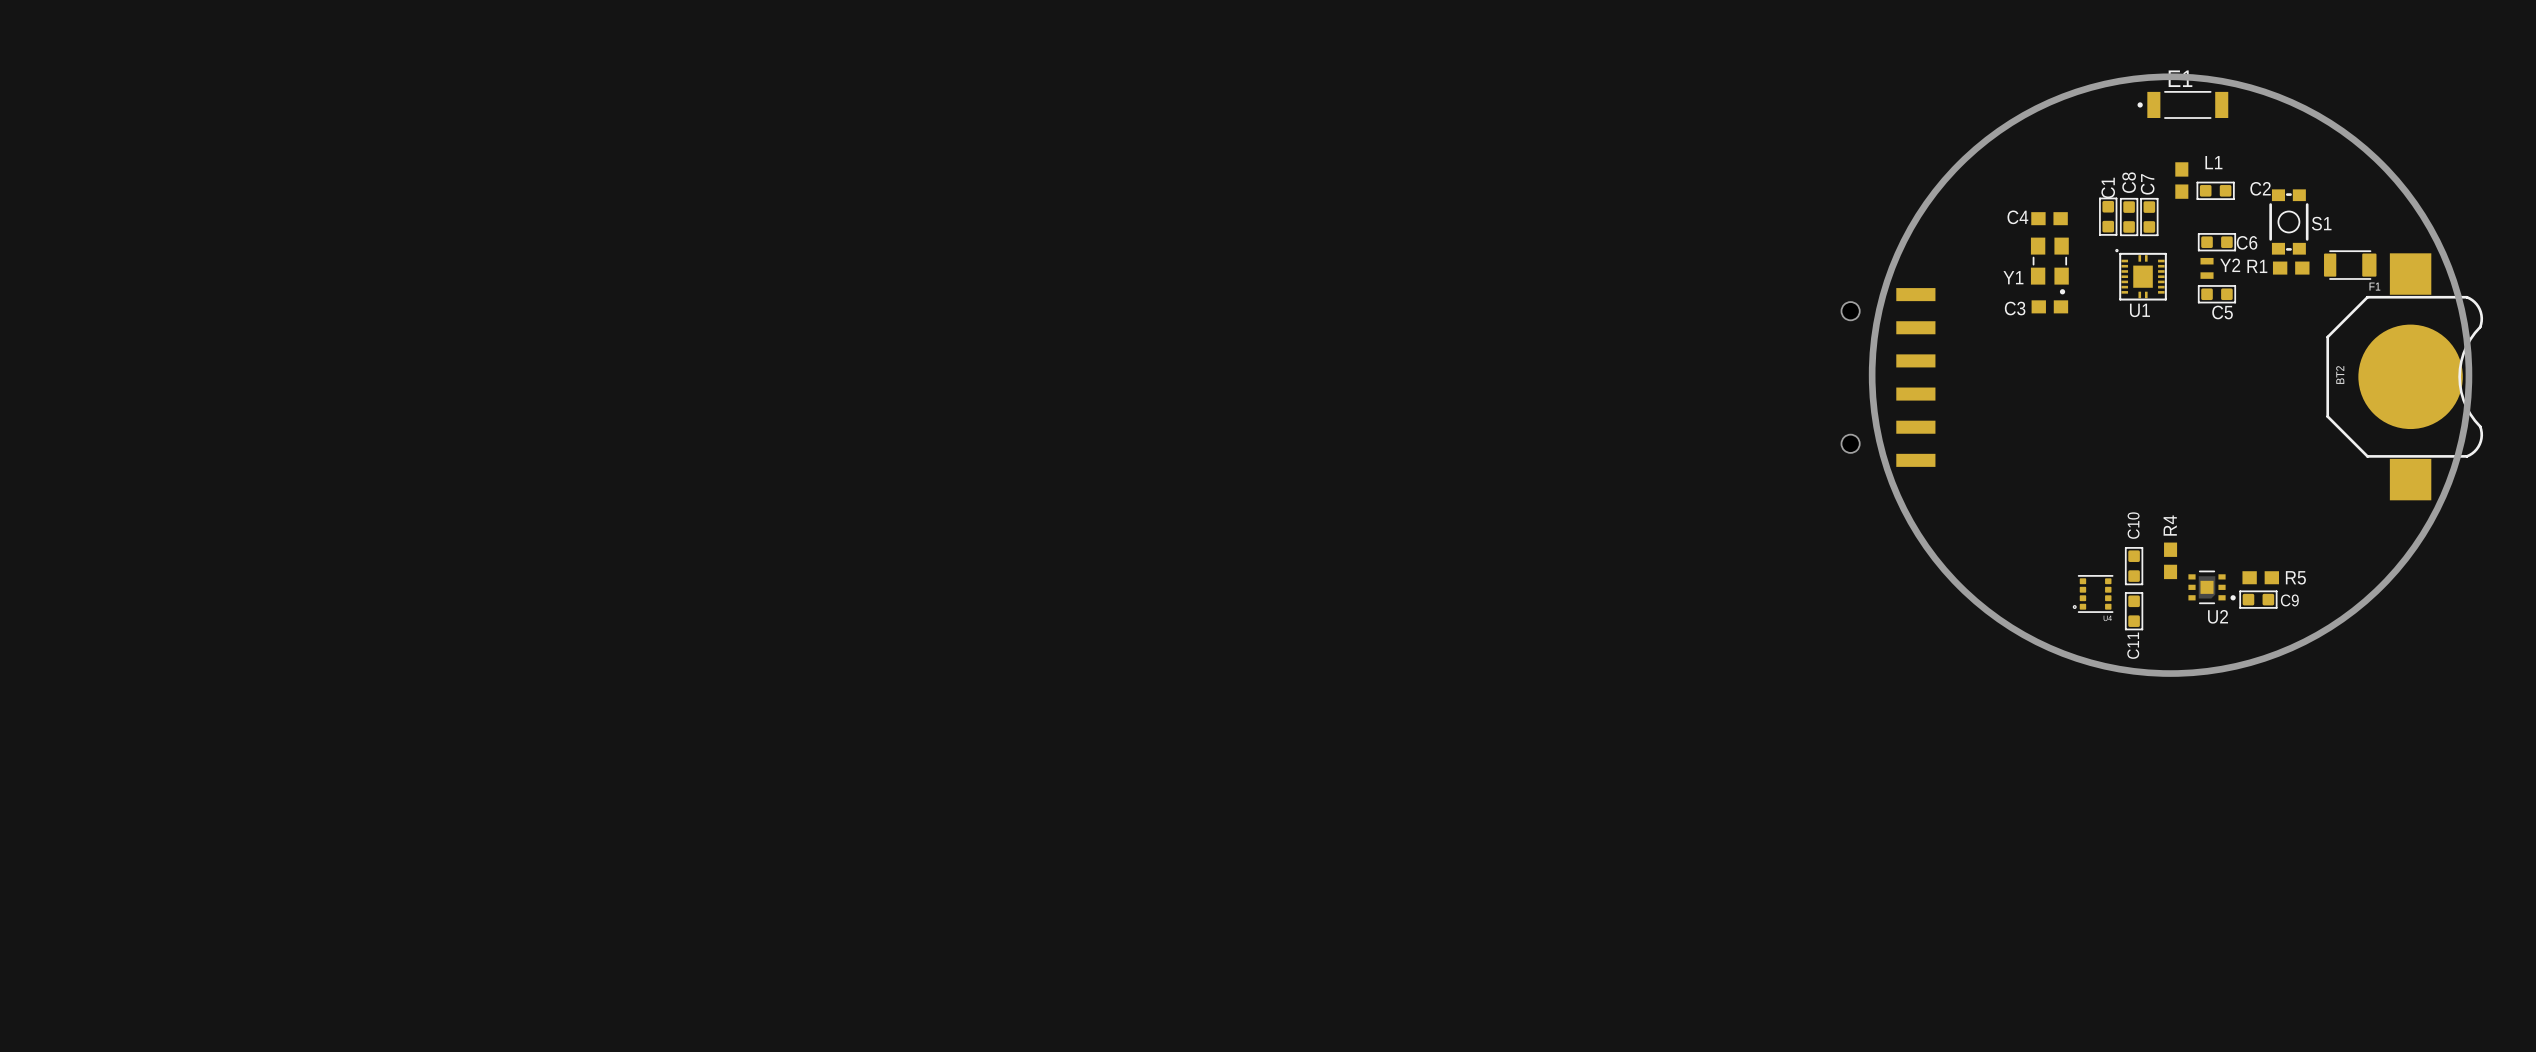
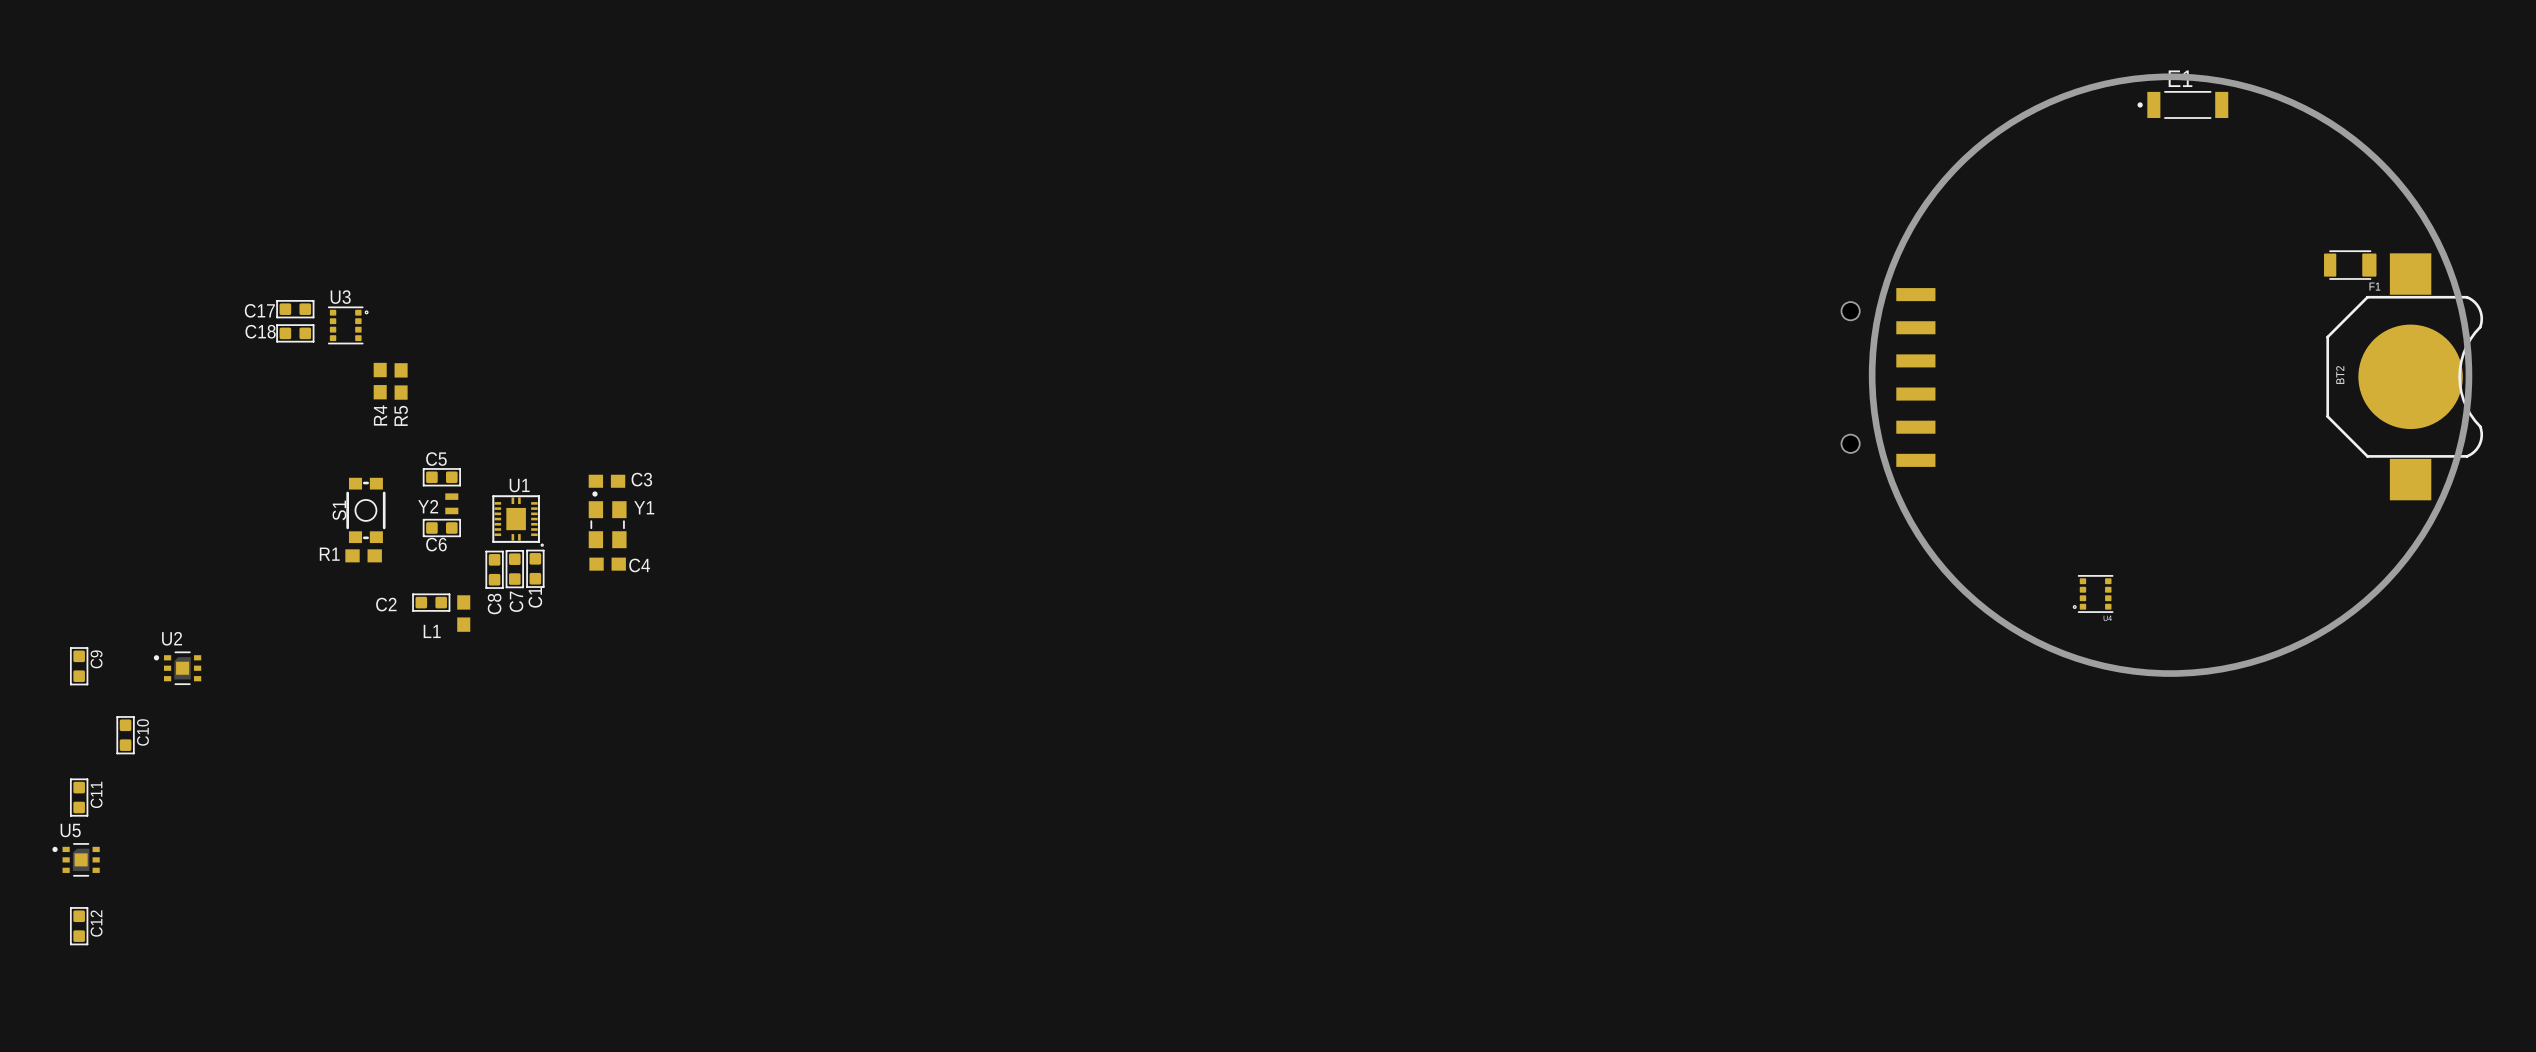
L1 name position: L1 (2213, 162) -> L1 (432, 631)
L1 position: (2181, 180) -> (463, 613)
C8 name position: C8 (2129, 182) -> C8 (494, 604)
C7 name position: C7 (2147, 184) -> C7 (516, 601)
C1 name position: C1 (2108, 187) -> C1 (535, 597)
C2 name position: C2 (2260, 188) -> C2 (386, 604)
C2 position: (2215, 190) -> (431, 602)
C1 position: (2108, 216) -> (535, 568)
C4 name position: C4 (2017, 217) -> C4 (639, 565)
C8 position: (2129, 217) -> (494, 569)
C7 position: (2149, 217) -> (514, 569)
C4 position: (2049, 218) -> (607, 564)
S1 position: (2288, 221) -> (365, 510)
S1 name rotation: 0° (2321, 223) -> 90° counterclockwise (339, 510)
S1 name position: S1 (2321, 223) -> S1 (339, 510)
C6 position: (2216, 242) -> (441, 528)
C6 name position: C6 (2247, 242) -> C6 (436, 544)
Y2 name position: Y2 (2230, 265) -> Y2 (428, 506)
Y1 rotation: 0° (2049, 266) -> 180° (607, 519)
Y1 position: (2049, 266) -> (607, 519)
Y2 position: (2207, 268) -> (451, 503)
R1 position: (2291, 268) -> (363, 555)
U1 rotation: 0° (2141, 274) -> 180° (518, 521)
U1 position: (2141, 274) -> (518, 521)
C5 position: (2216, 294) -> (441, 477)
C3 position: (2049, 306) -> (606, 481)
C3 name position: C3 (2015, 308) -> C3 (641, 479)
C17: none -> (295, 309)
C5 name position: C5 (2222, 312) -> C5 (436, 459)
U3: none -> (348, 325)
C18: none -> (295, 333)
C10 name position: C10 (2133, 525) -> C10 (142, 732)
R4 name position: R4 (2170, 525) -> R4 (380, 415)
R4 position: (2170, 560) -> (380, 381)
C10 position: (2134, 566) -> (125, 735)
R5 rotation: 0° (2260, 577) -> 90° clockwise (401, 381)
R5 position: (2260, 577) -> (401, 381)
U2 rotation: 0° (2212, 587) -> 180° (177, 668)
U2 position: (2212, 587) -> (177, 668)
C9 rotation: 0° (2258, 599) -> 90° clockwise (79, 666)
C9 position: (2258, 599) -> (79, 666)
C11 position: (2134, 611) -> (79, 797)
C11 name position: C11 (2133, 645) -> C11 (96, 794)
U5: none -> (76, 859)
C12: none -> (79, 926)

